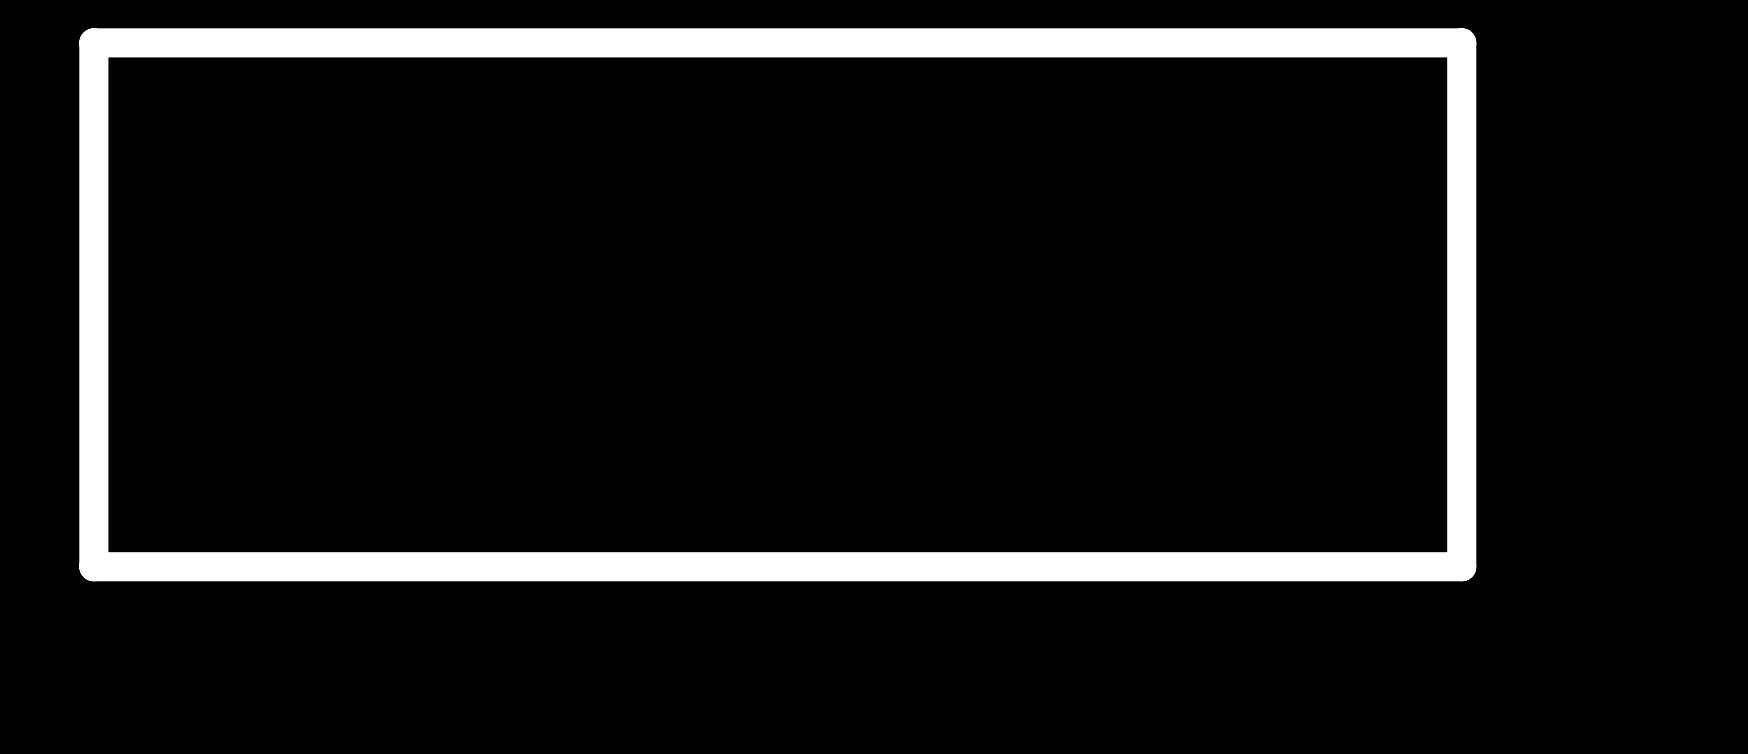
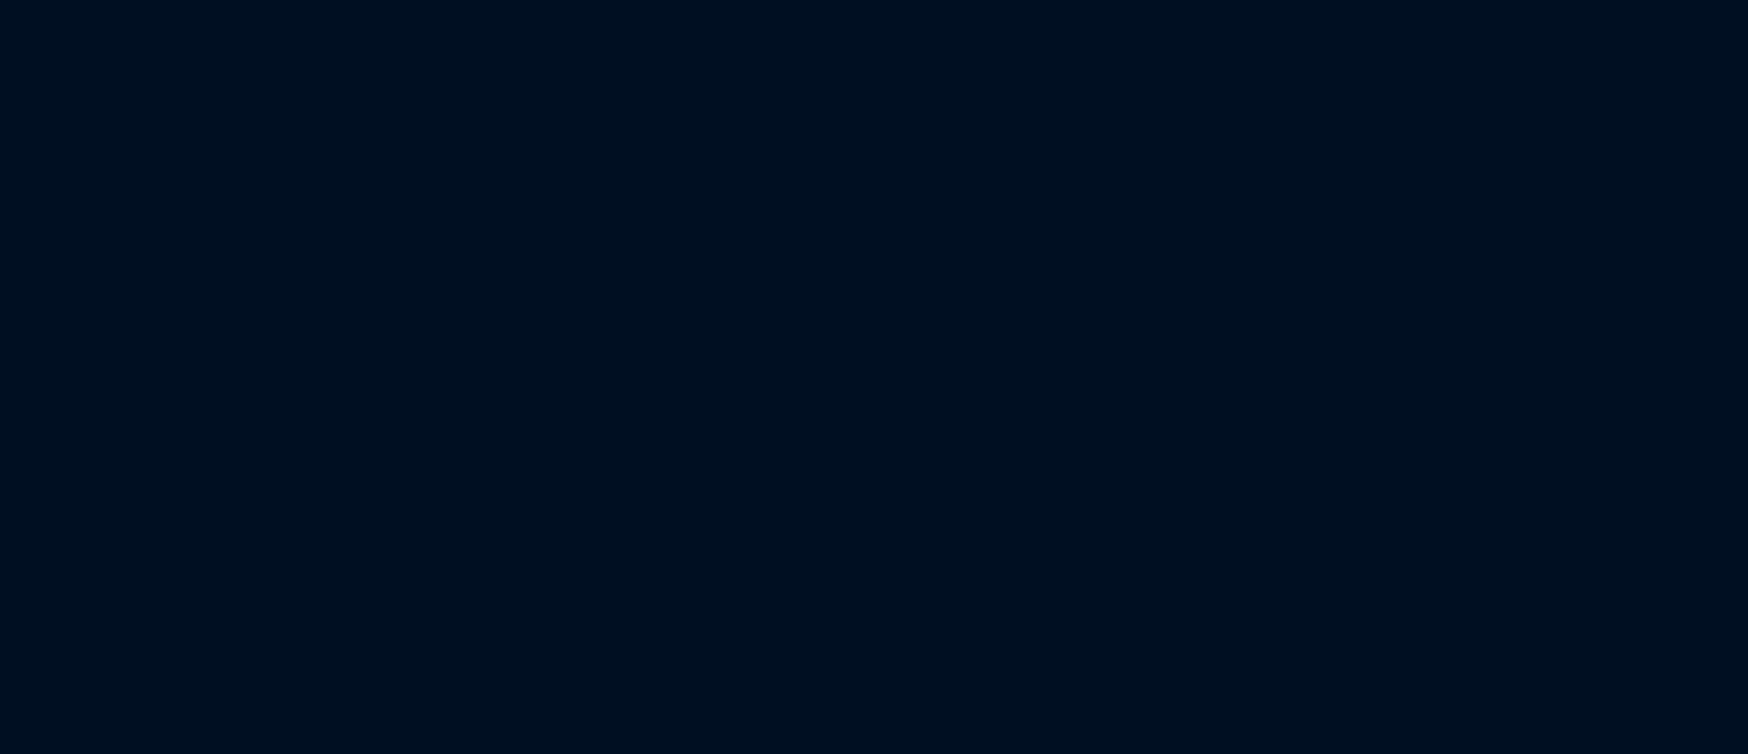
board edge: (1461, 42) (93, 42) (93, 566) (1461, 566) (1461, 42) -> none

